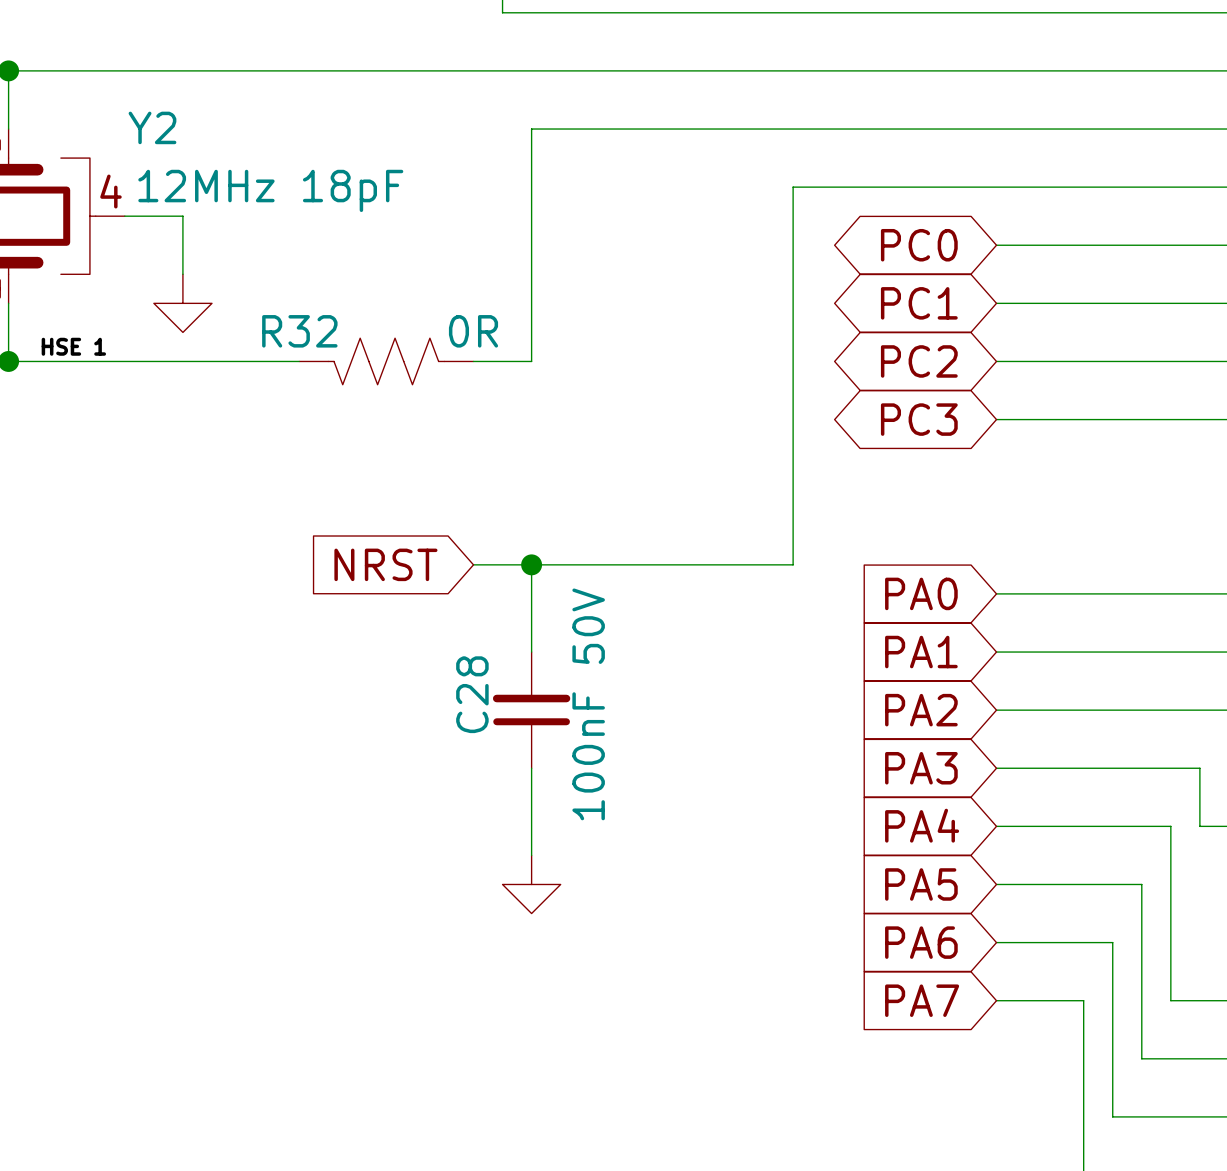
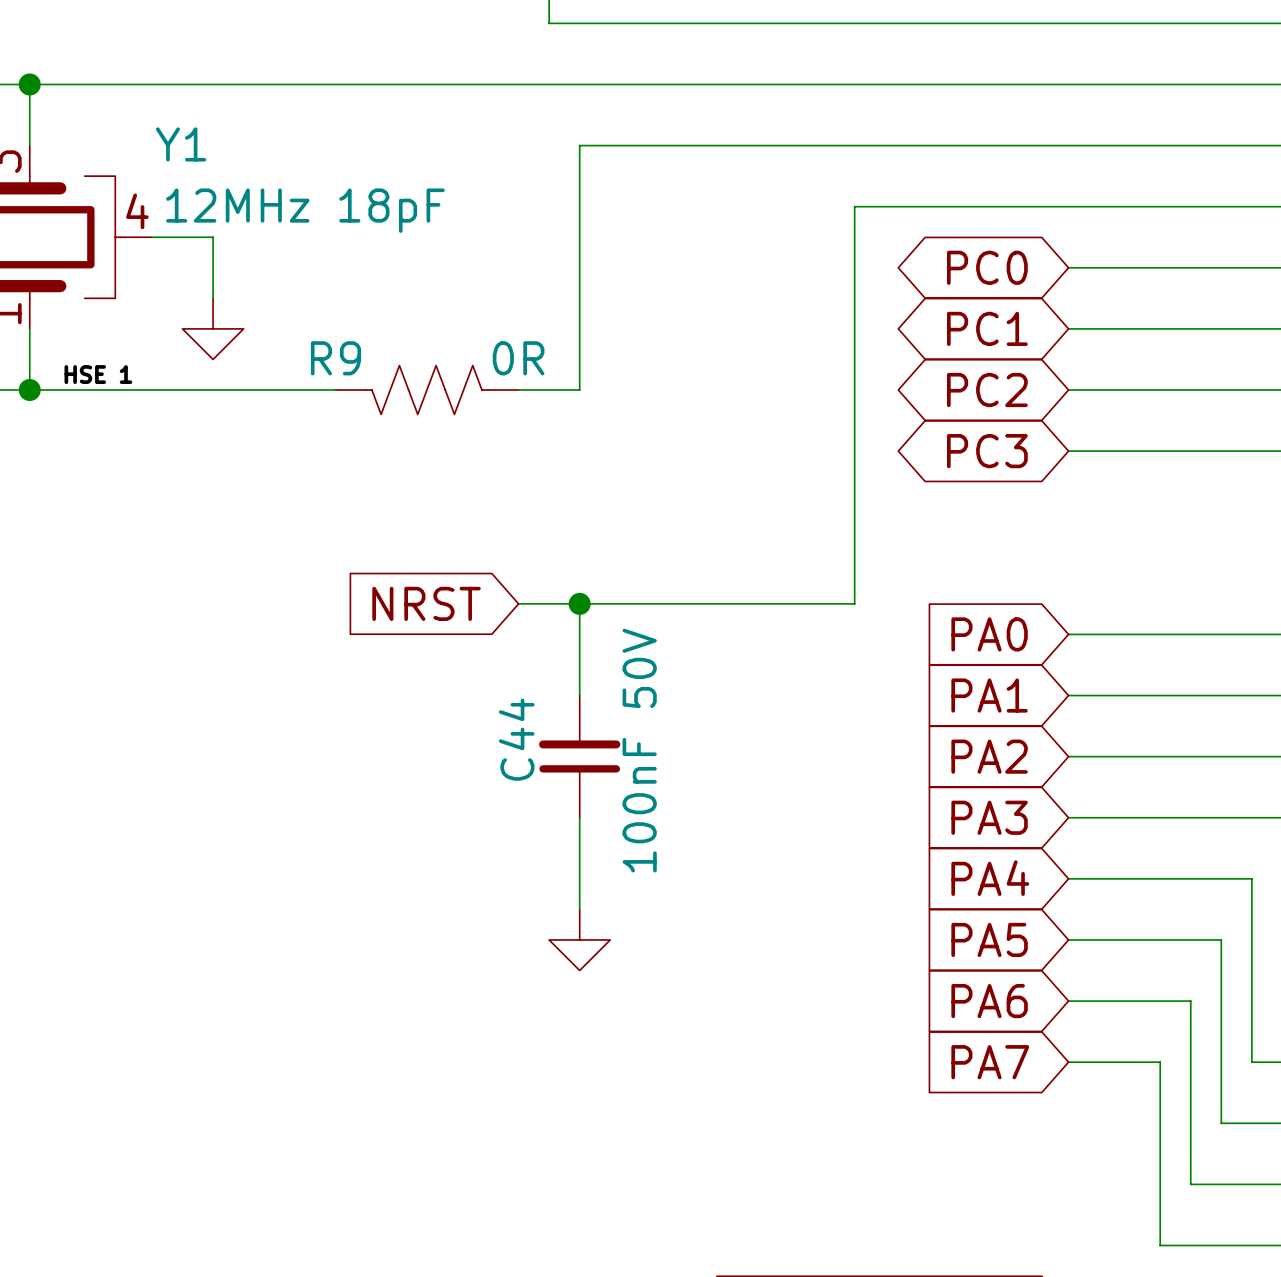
Y2 name: Y2 (152, 127) -> Y1 (181, 144)
R32 name: R32 (299, 331) -> R9 (336, 358)
C28 name: C28 (472, 694) -> C44 (516, 739)

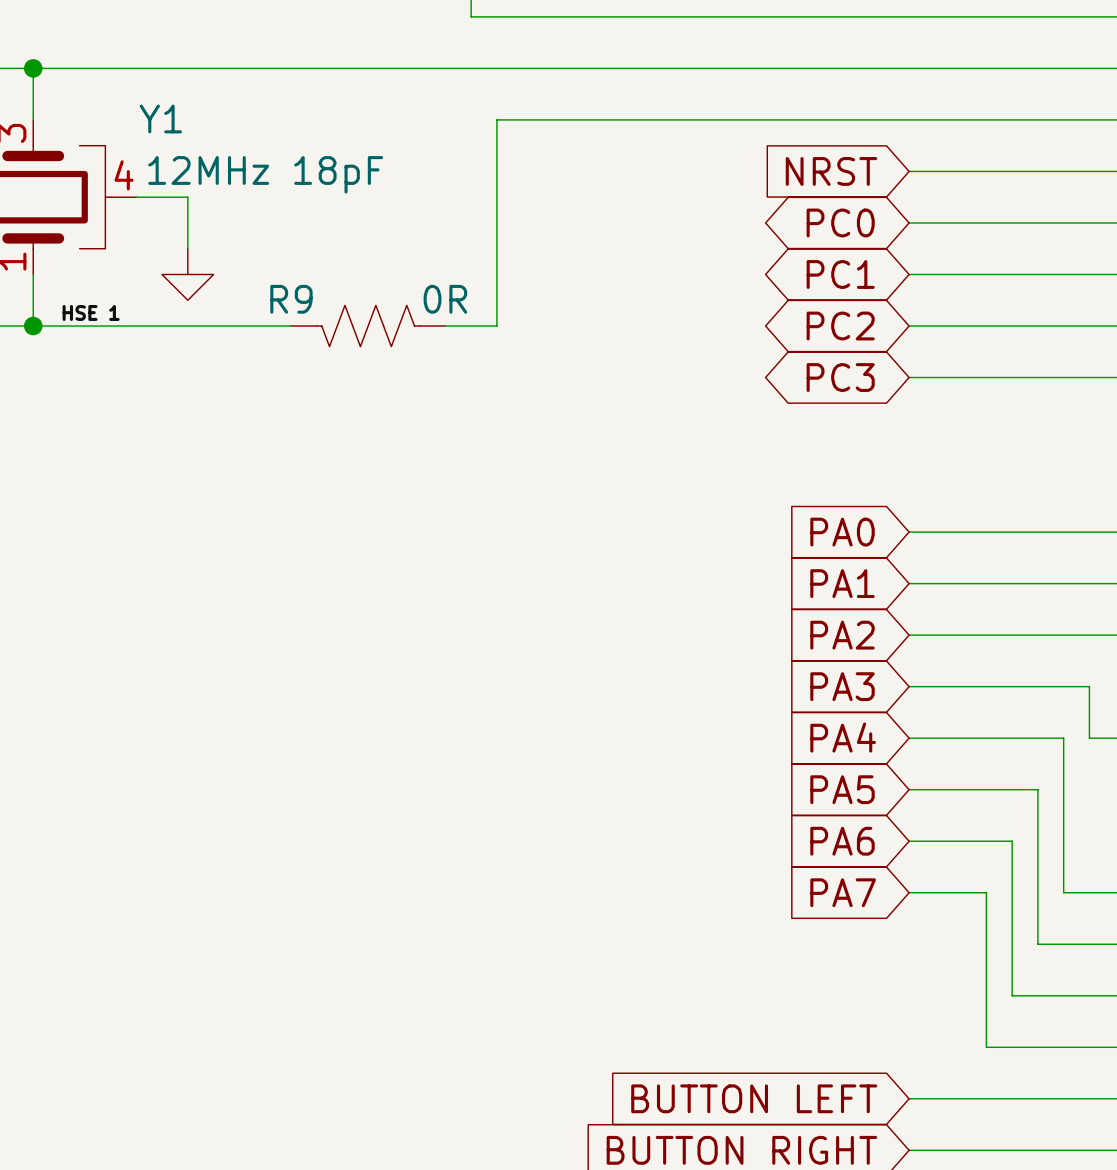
global label: none -> NRST (831, 171)
wire: (1068, 206) (854, 206) (854, 603) (518, 603) -> none
global label: NRST (426, 603) -> none
wire: (579, 603) (579, 695) -> none
junction: (579, 603) -> none
C44: 100nF 50V (579, 756) -> none
wire: (579, 817) (579, 909) -> none
power symbol: (579, 939) -> none

